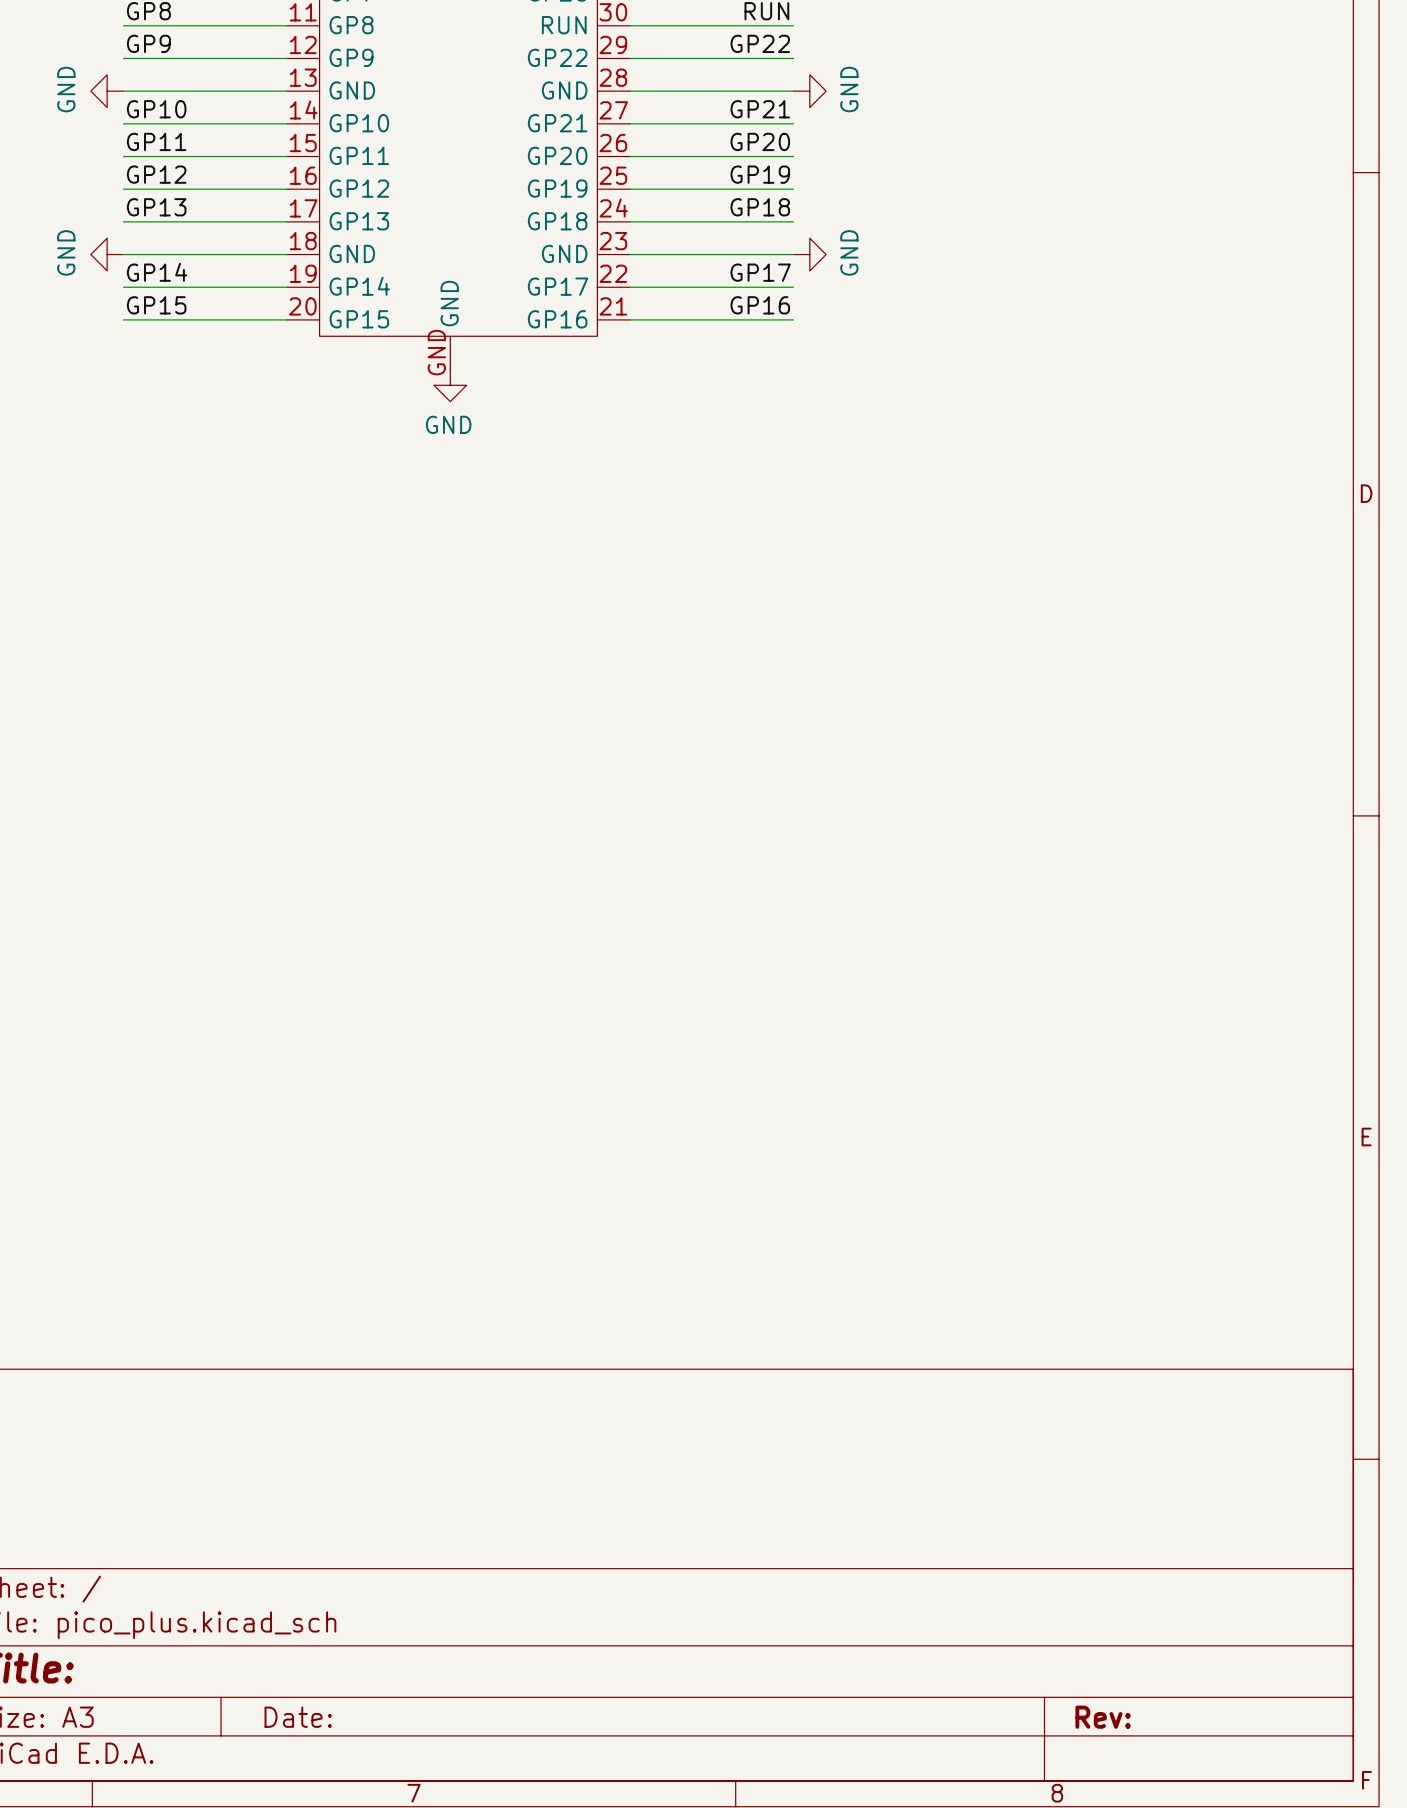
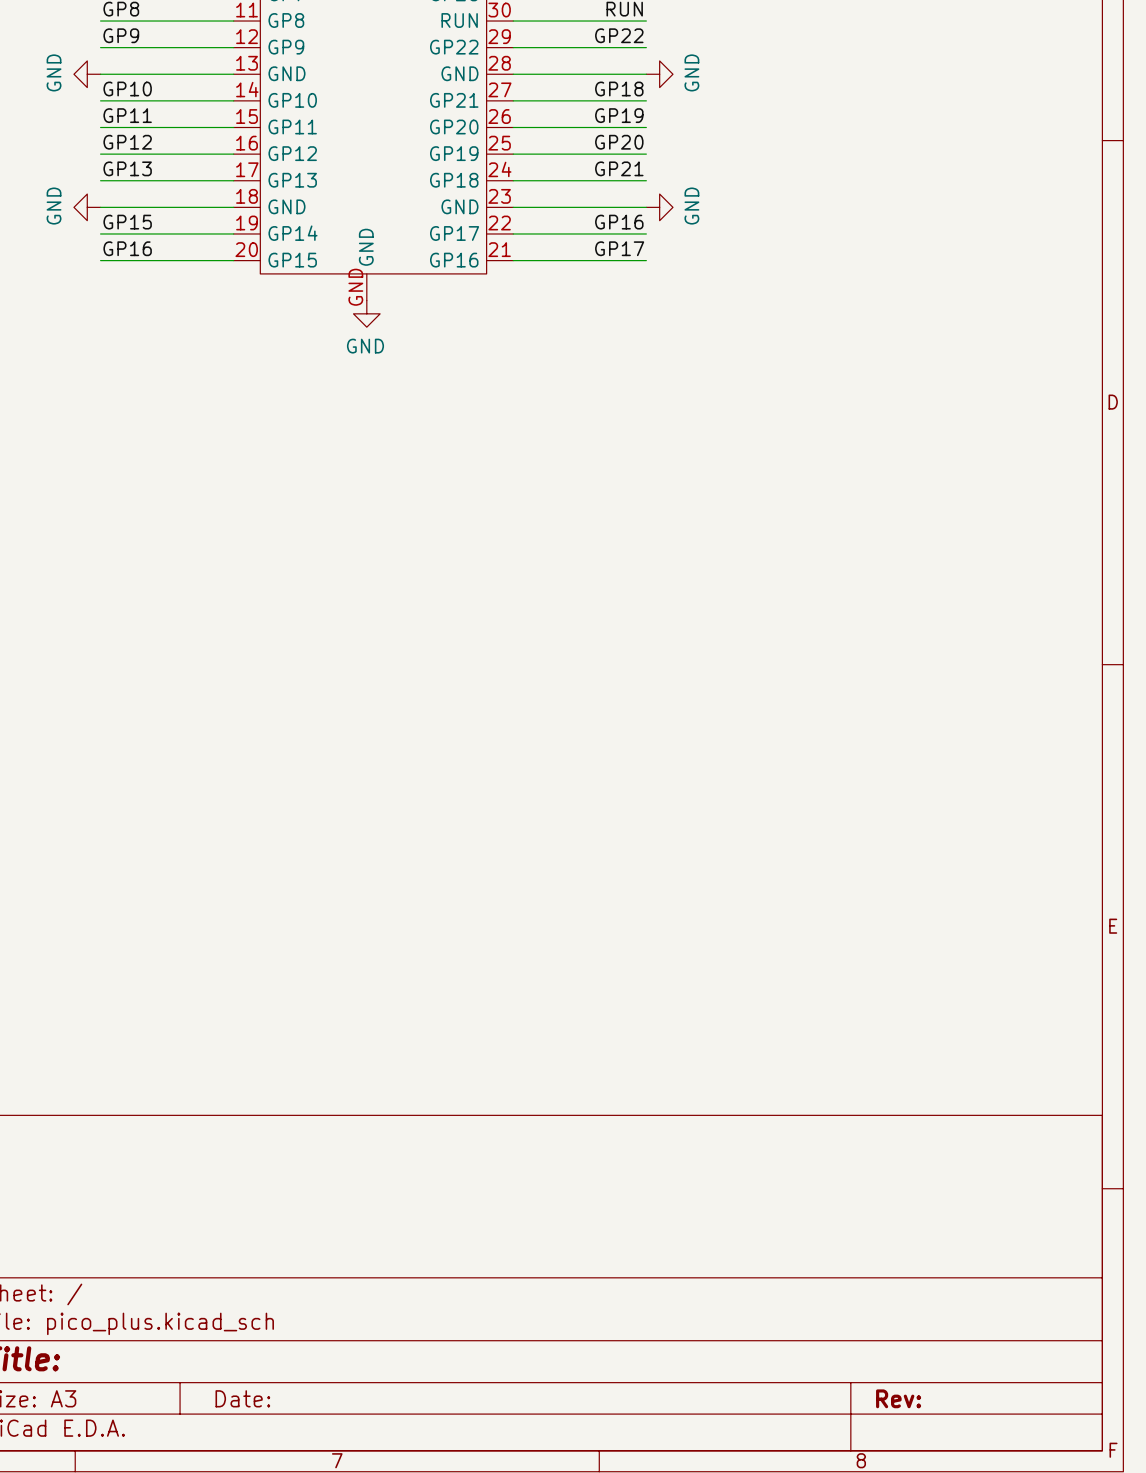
label: GP21 (760, 109) -> GP18 (619, 89)
label: GP20 (760, 141) -> GP19 (619, 115)
label: GP19 (760, 174) -> GP20 (619, 142)
label: GP18 (760, 207) -> GP21 (619, 168)
label: GP14 (157, 272) -> GP15 (127, 222)
label: GP17 (760, 272) -> GP16 (619, 222)
label: GP15 (156, 305) -> GP16 (127, 248)
label: GP16 (760, 305) -> GP17 (619, 248)

